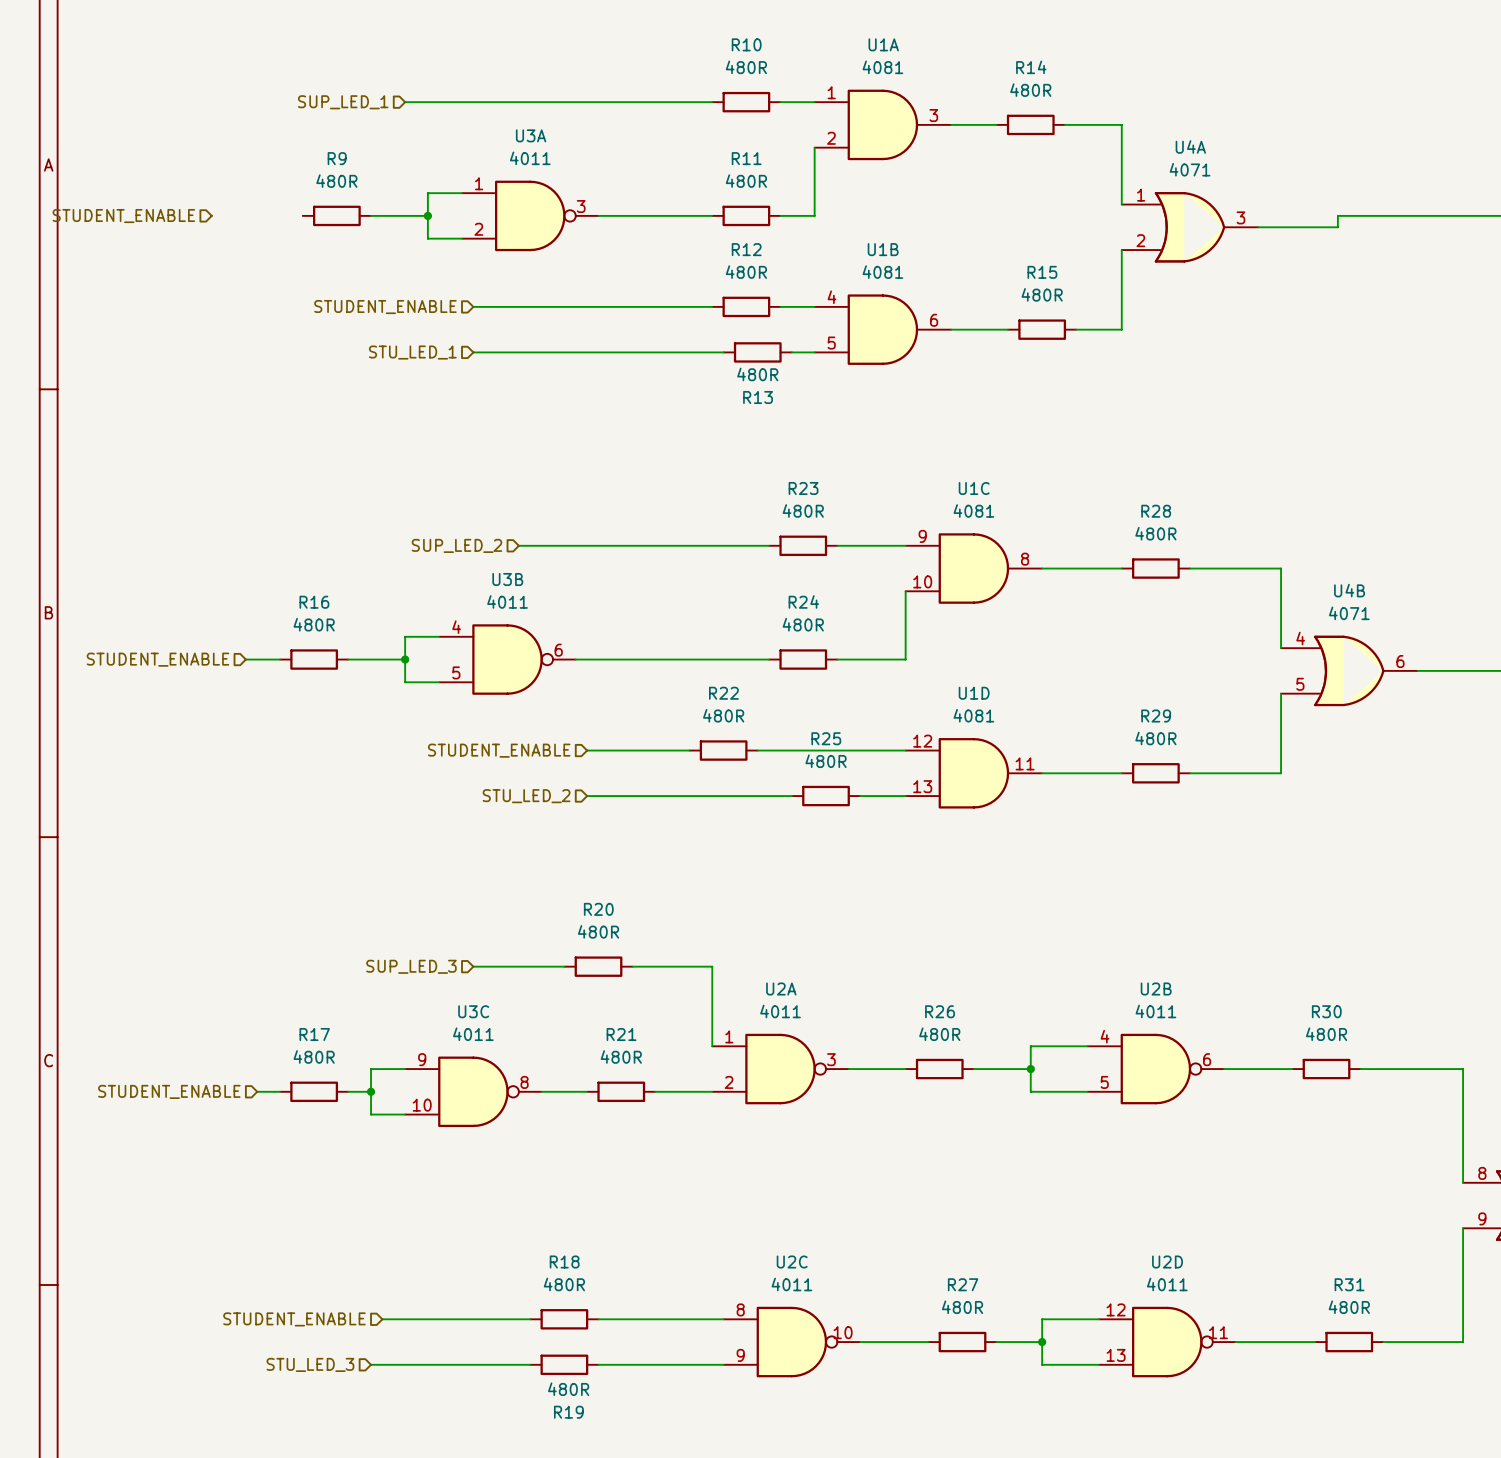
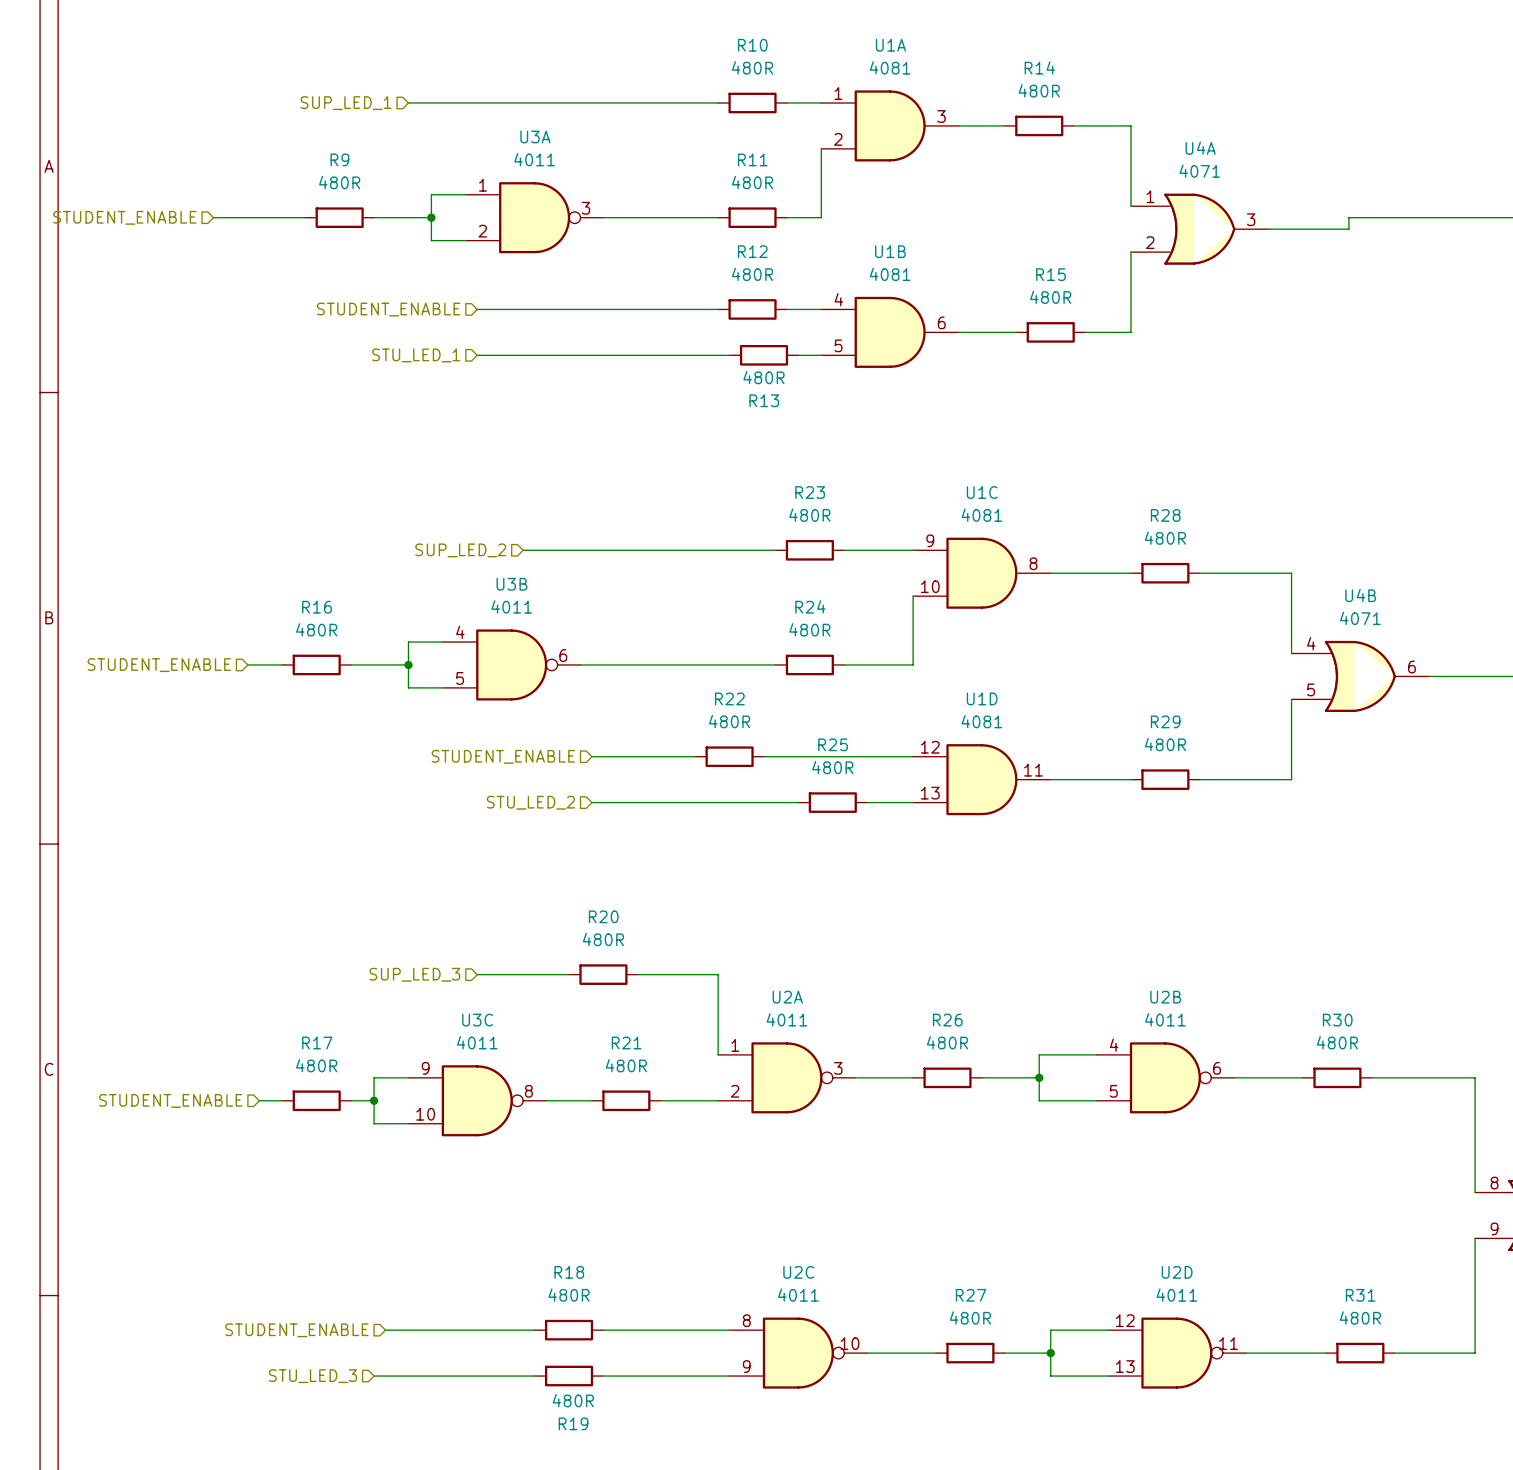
wire: none -> (213, 217) (305, 217)

